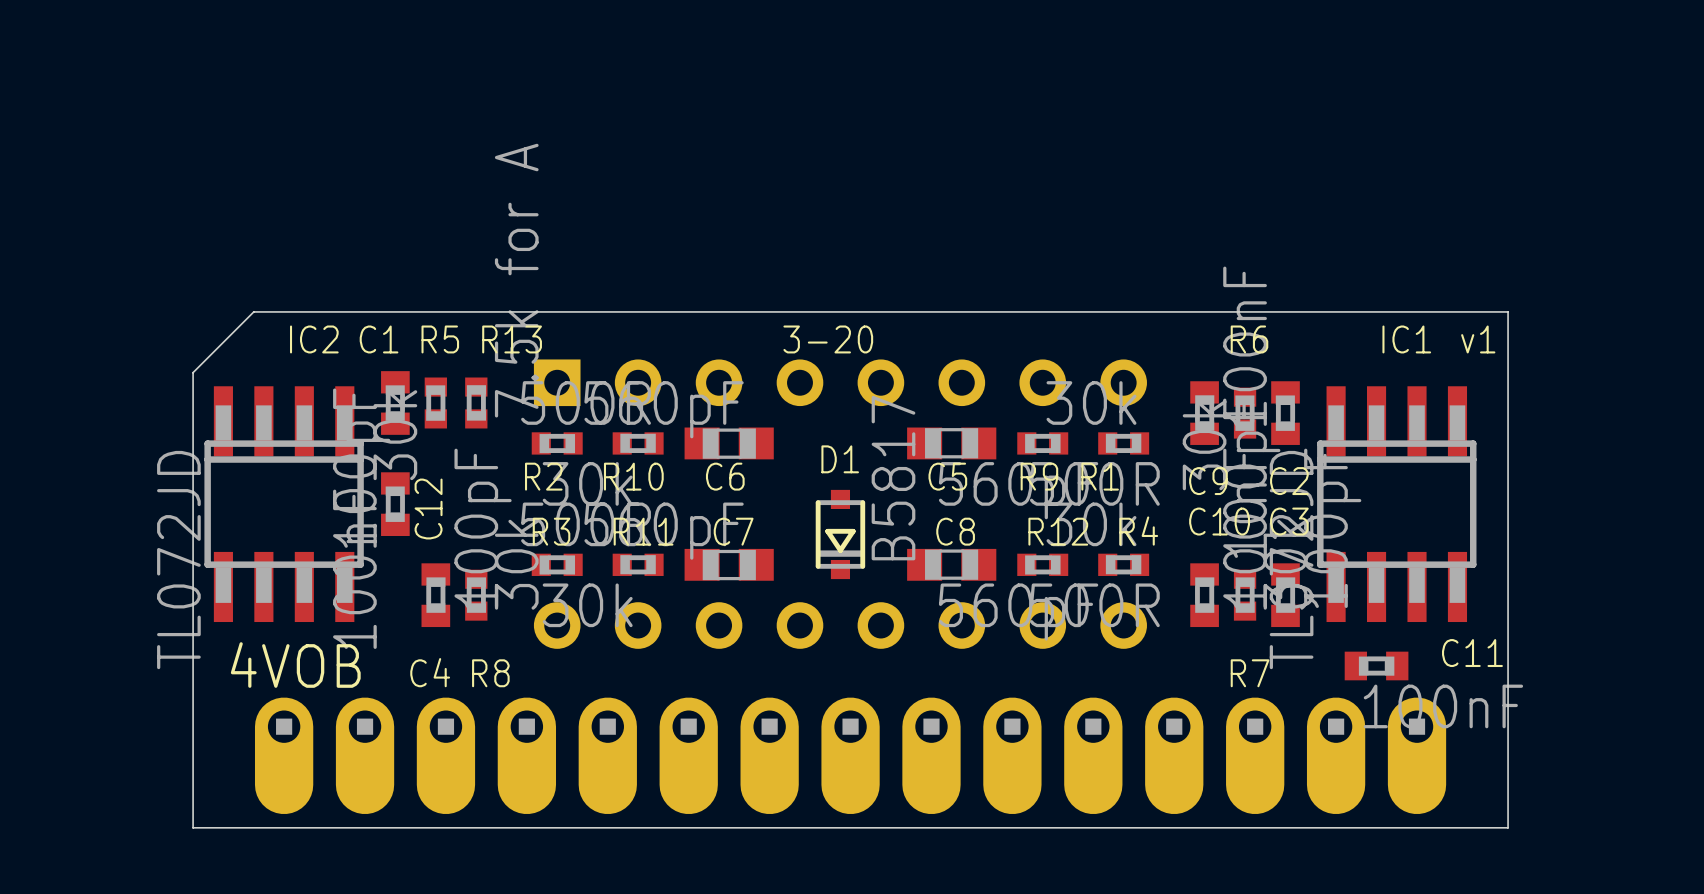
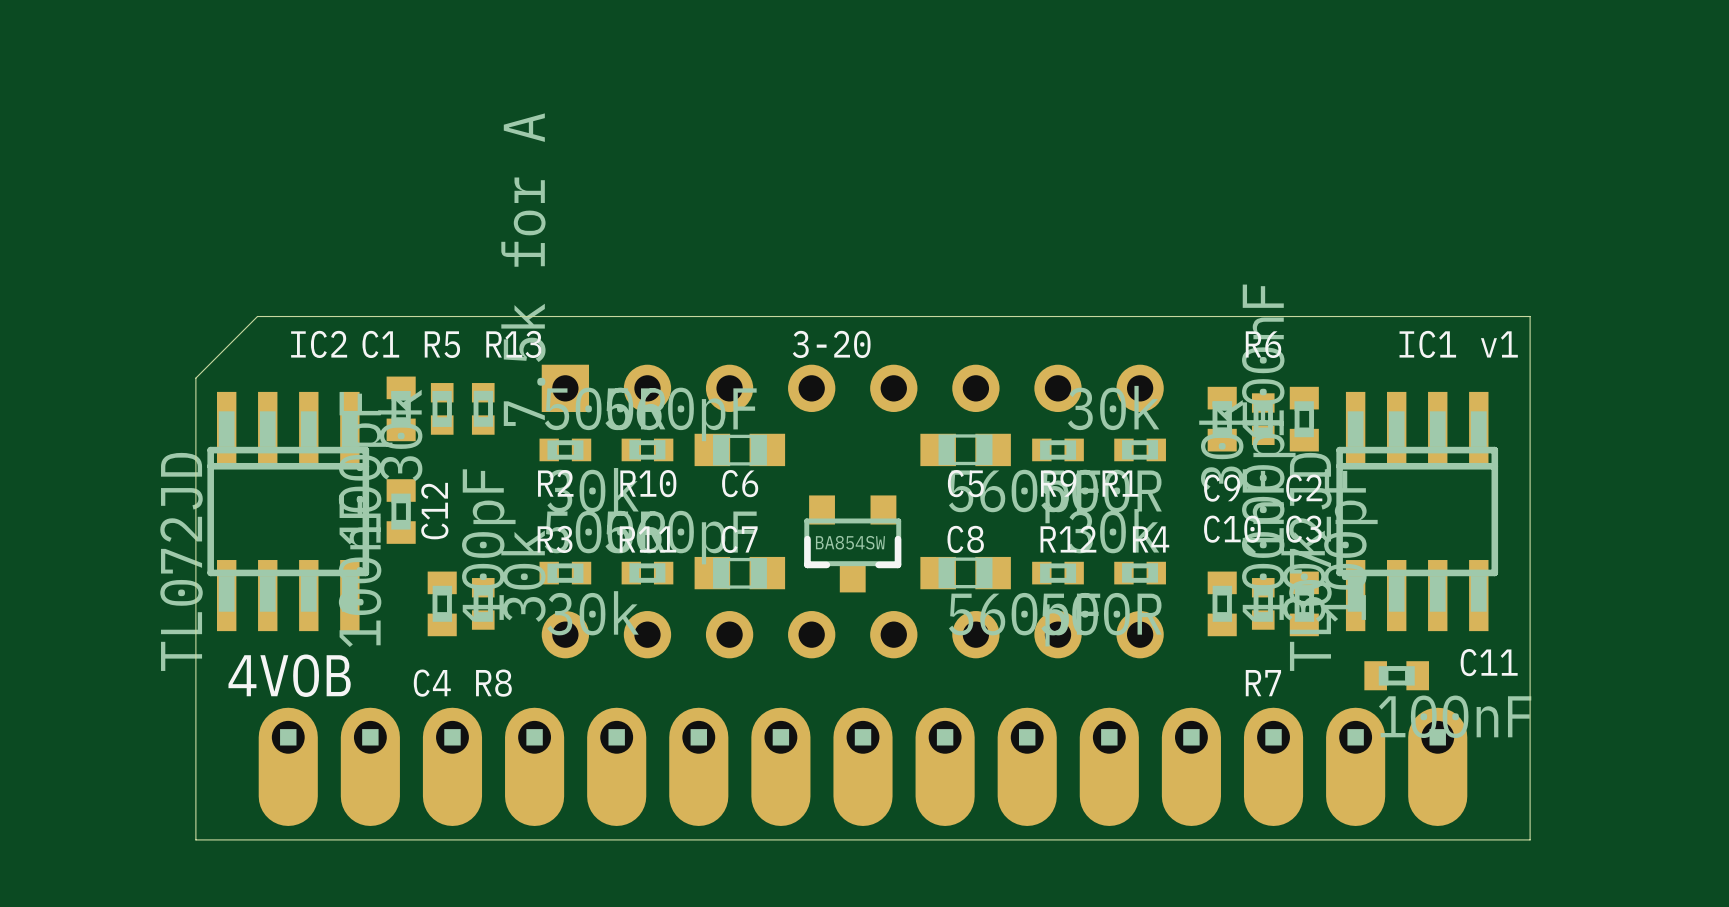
D1: B5817 (840, 534) -> none
part: none -> BA854SW (852, 543)

